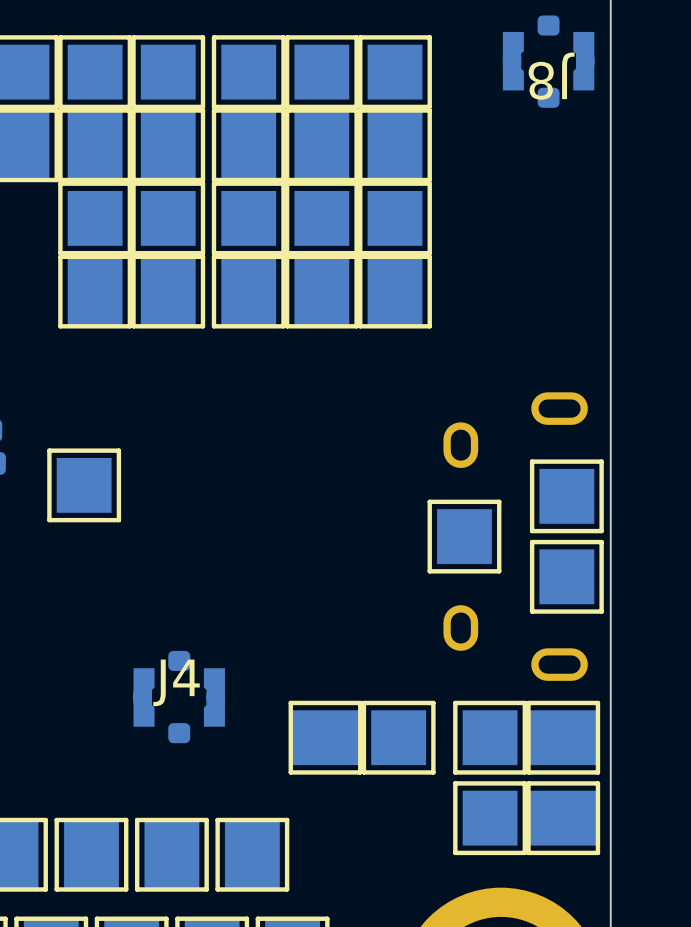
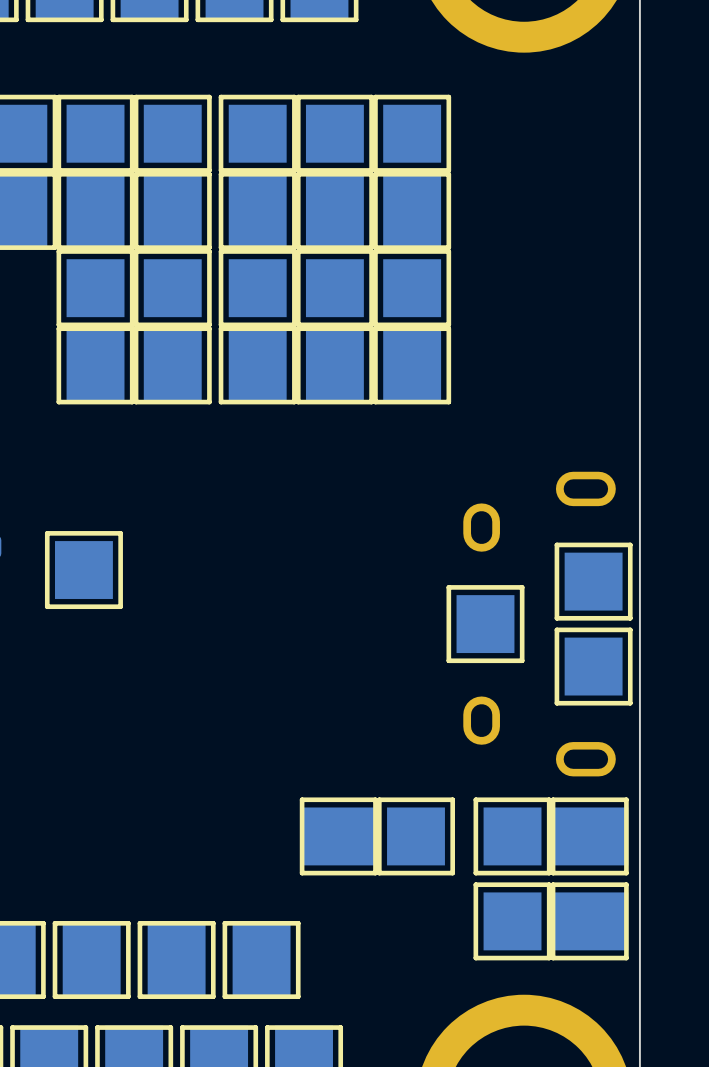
J8: (548, 61) -> none
J4: (179, 697) -> none

